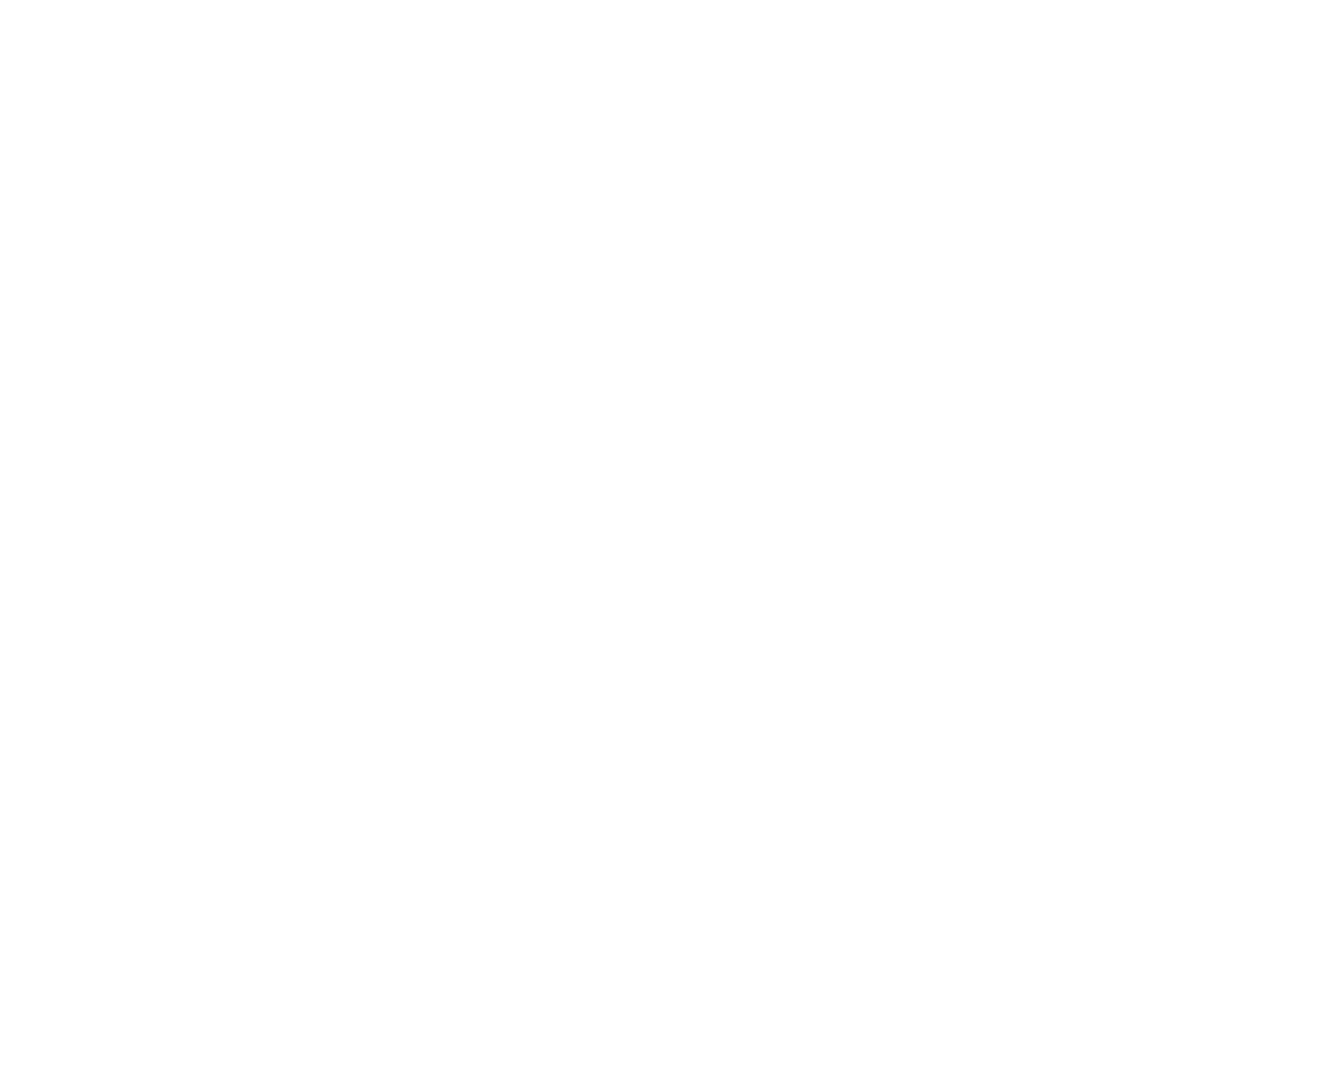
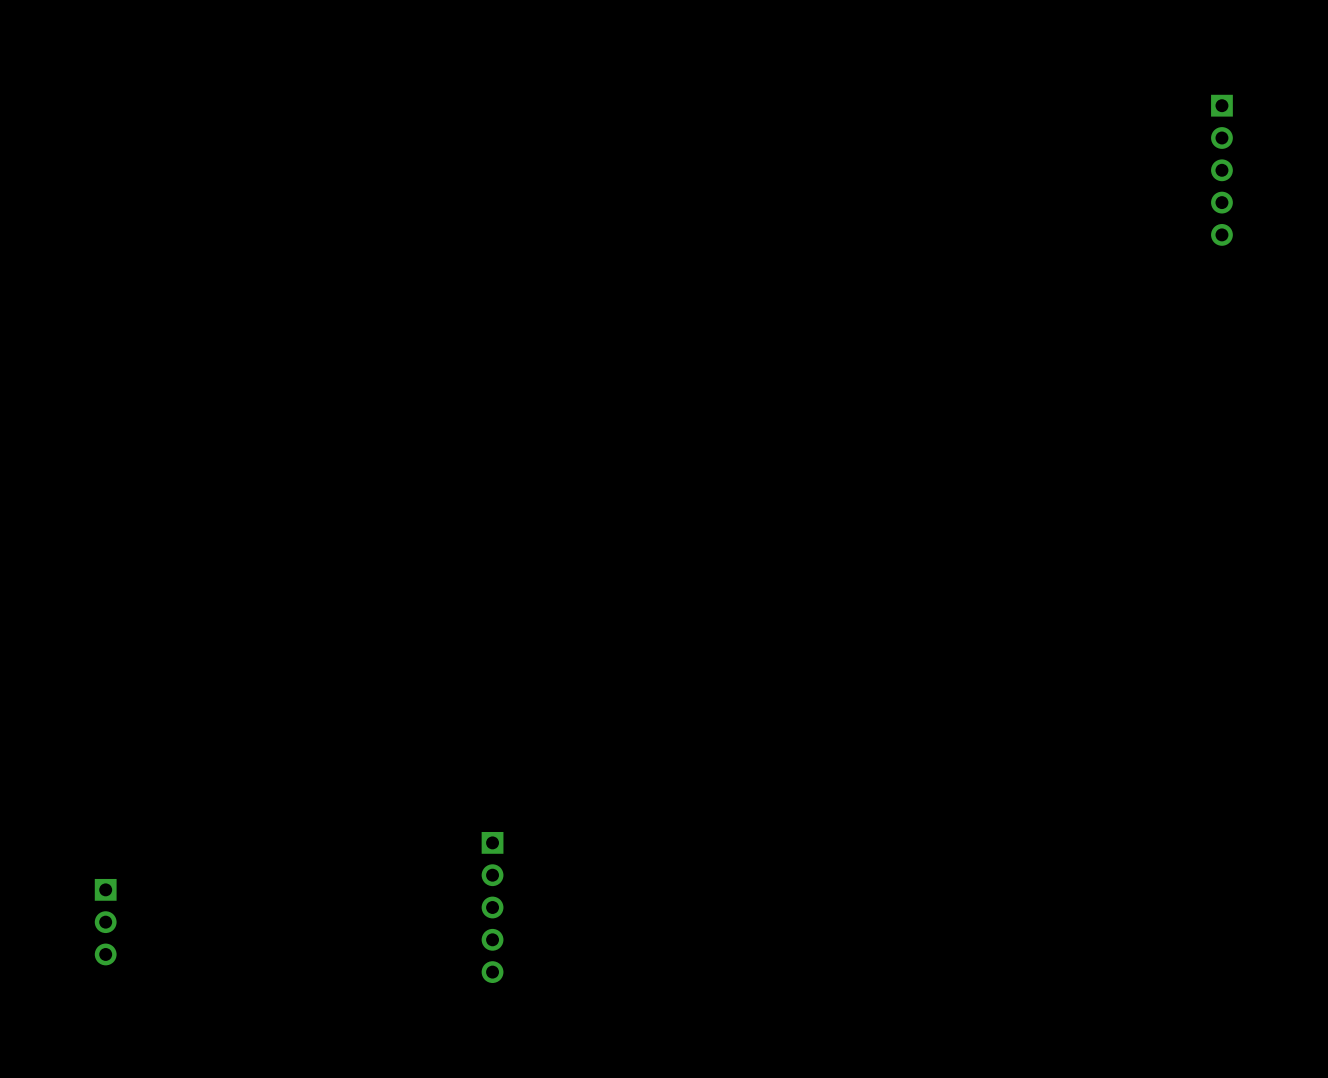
part: none -> (1221, 170)
part: none -> (492, 907)
part: none -> (105, 922)

